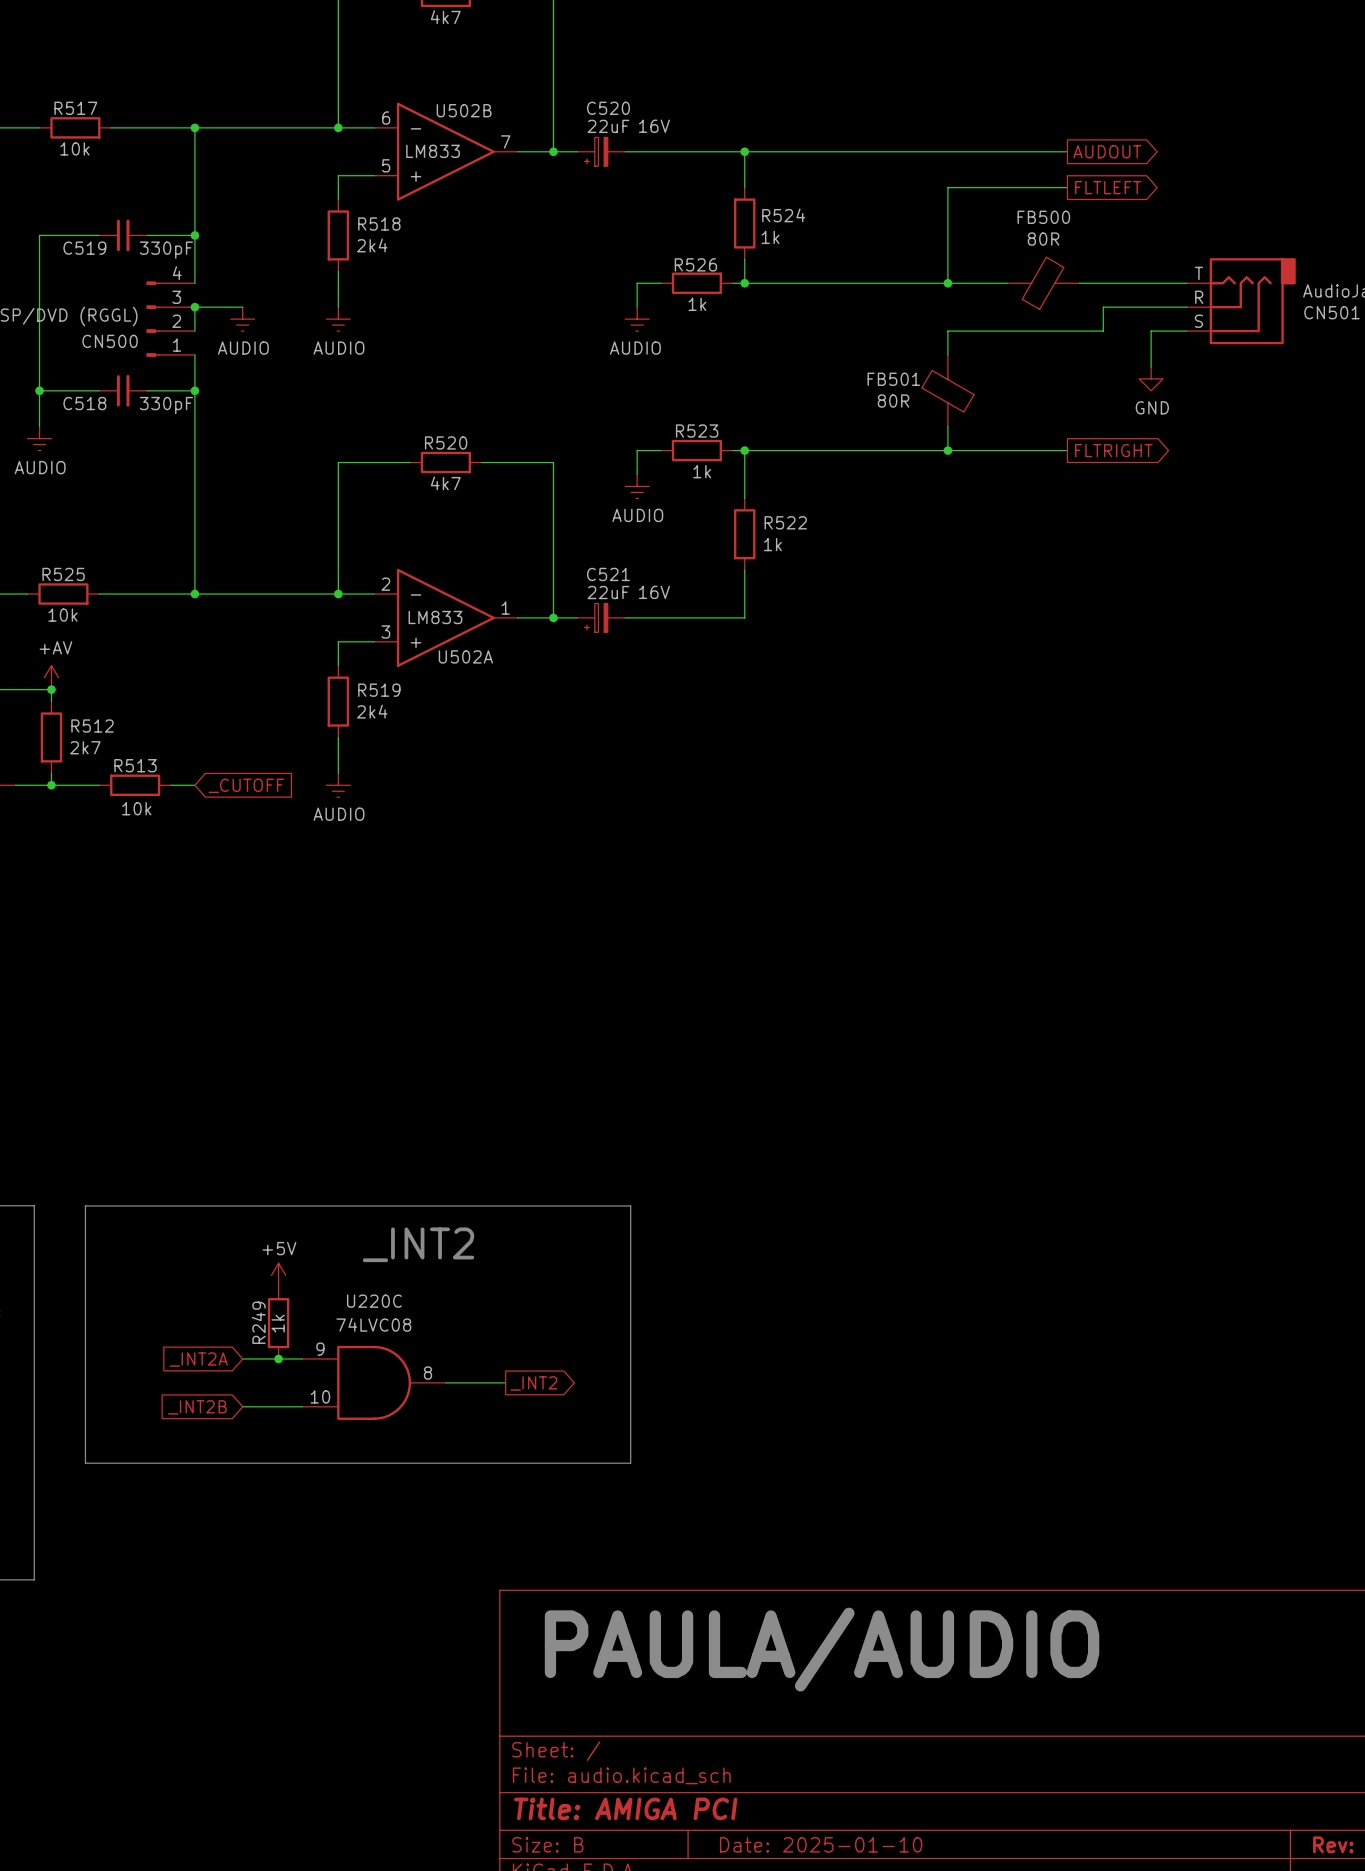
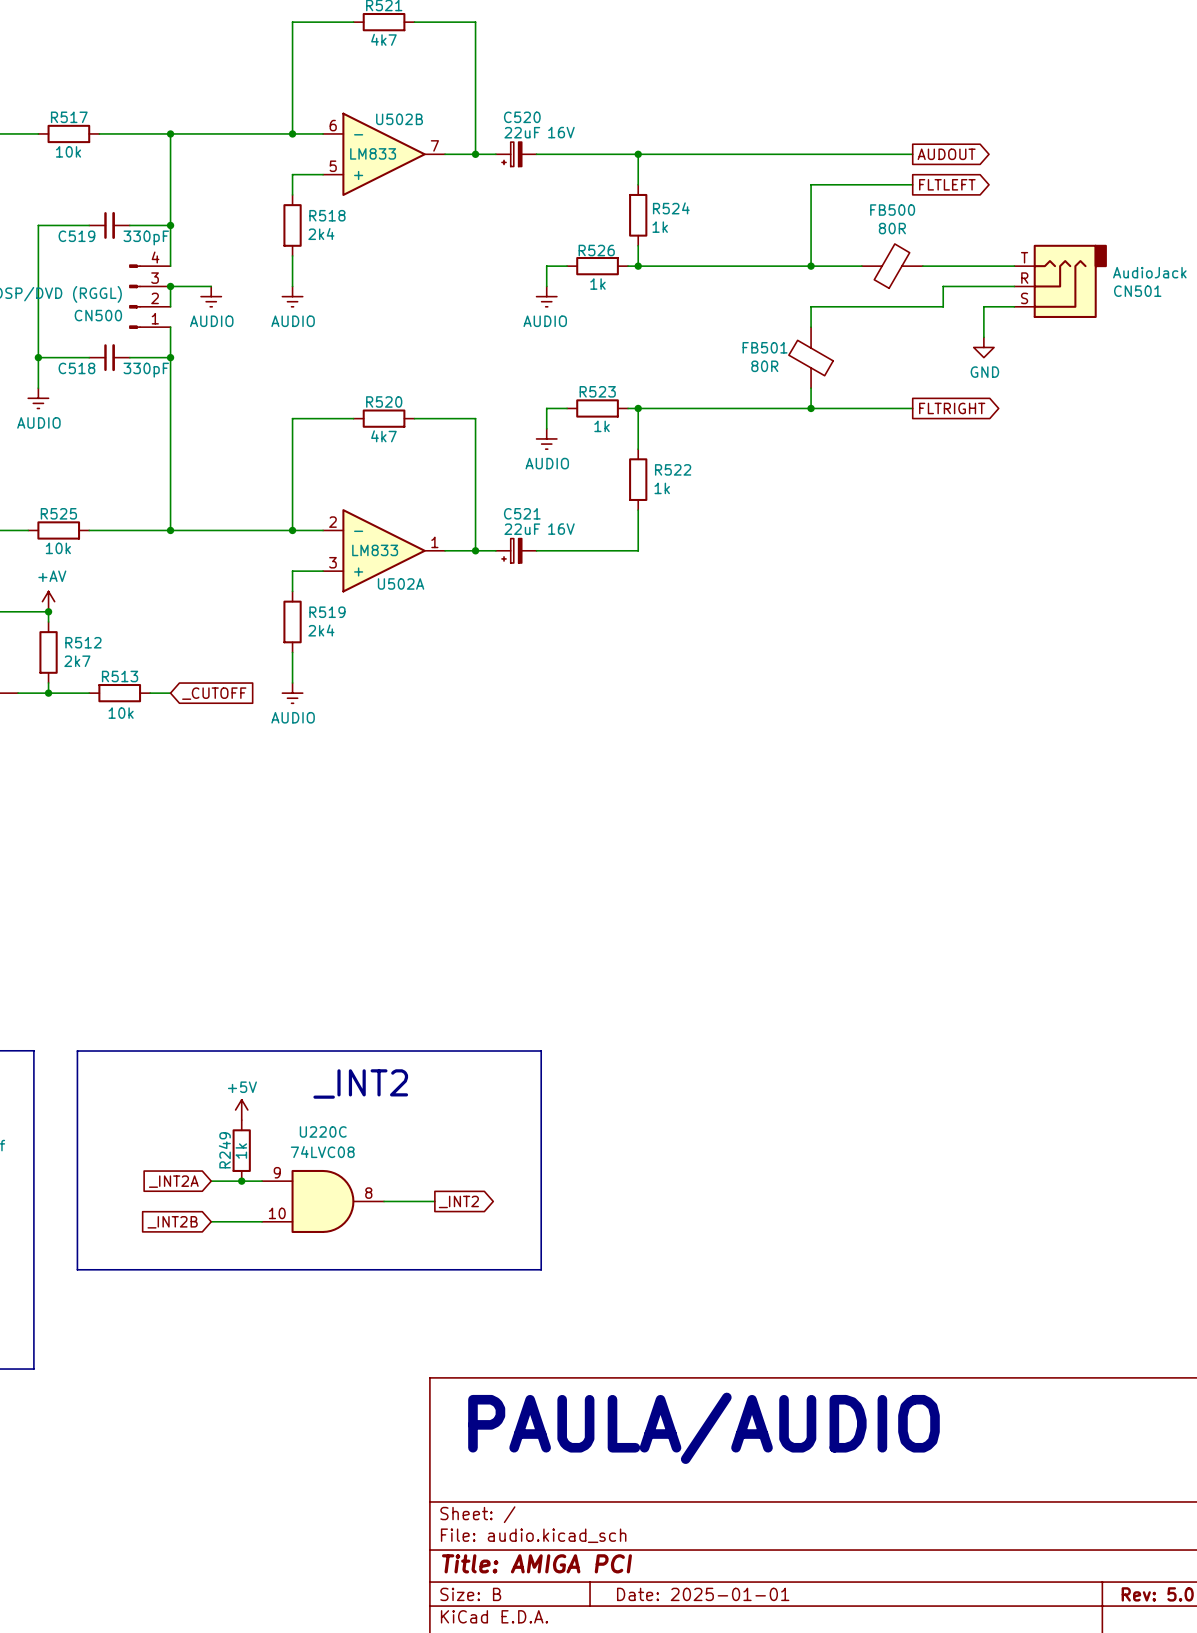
title block: Date: 2025-01-10 (821, 1844) -> Date: 2025-01-01 (703, 1594)

